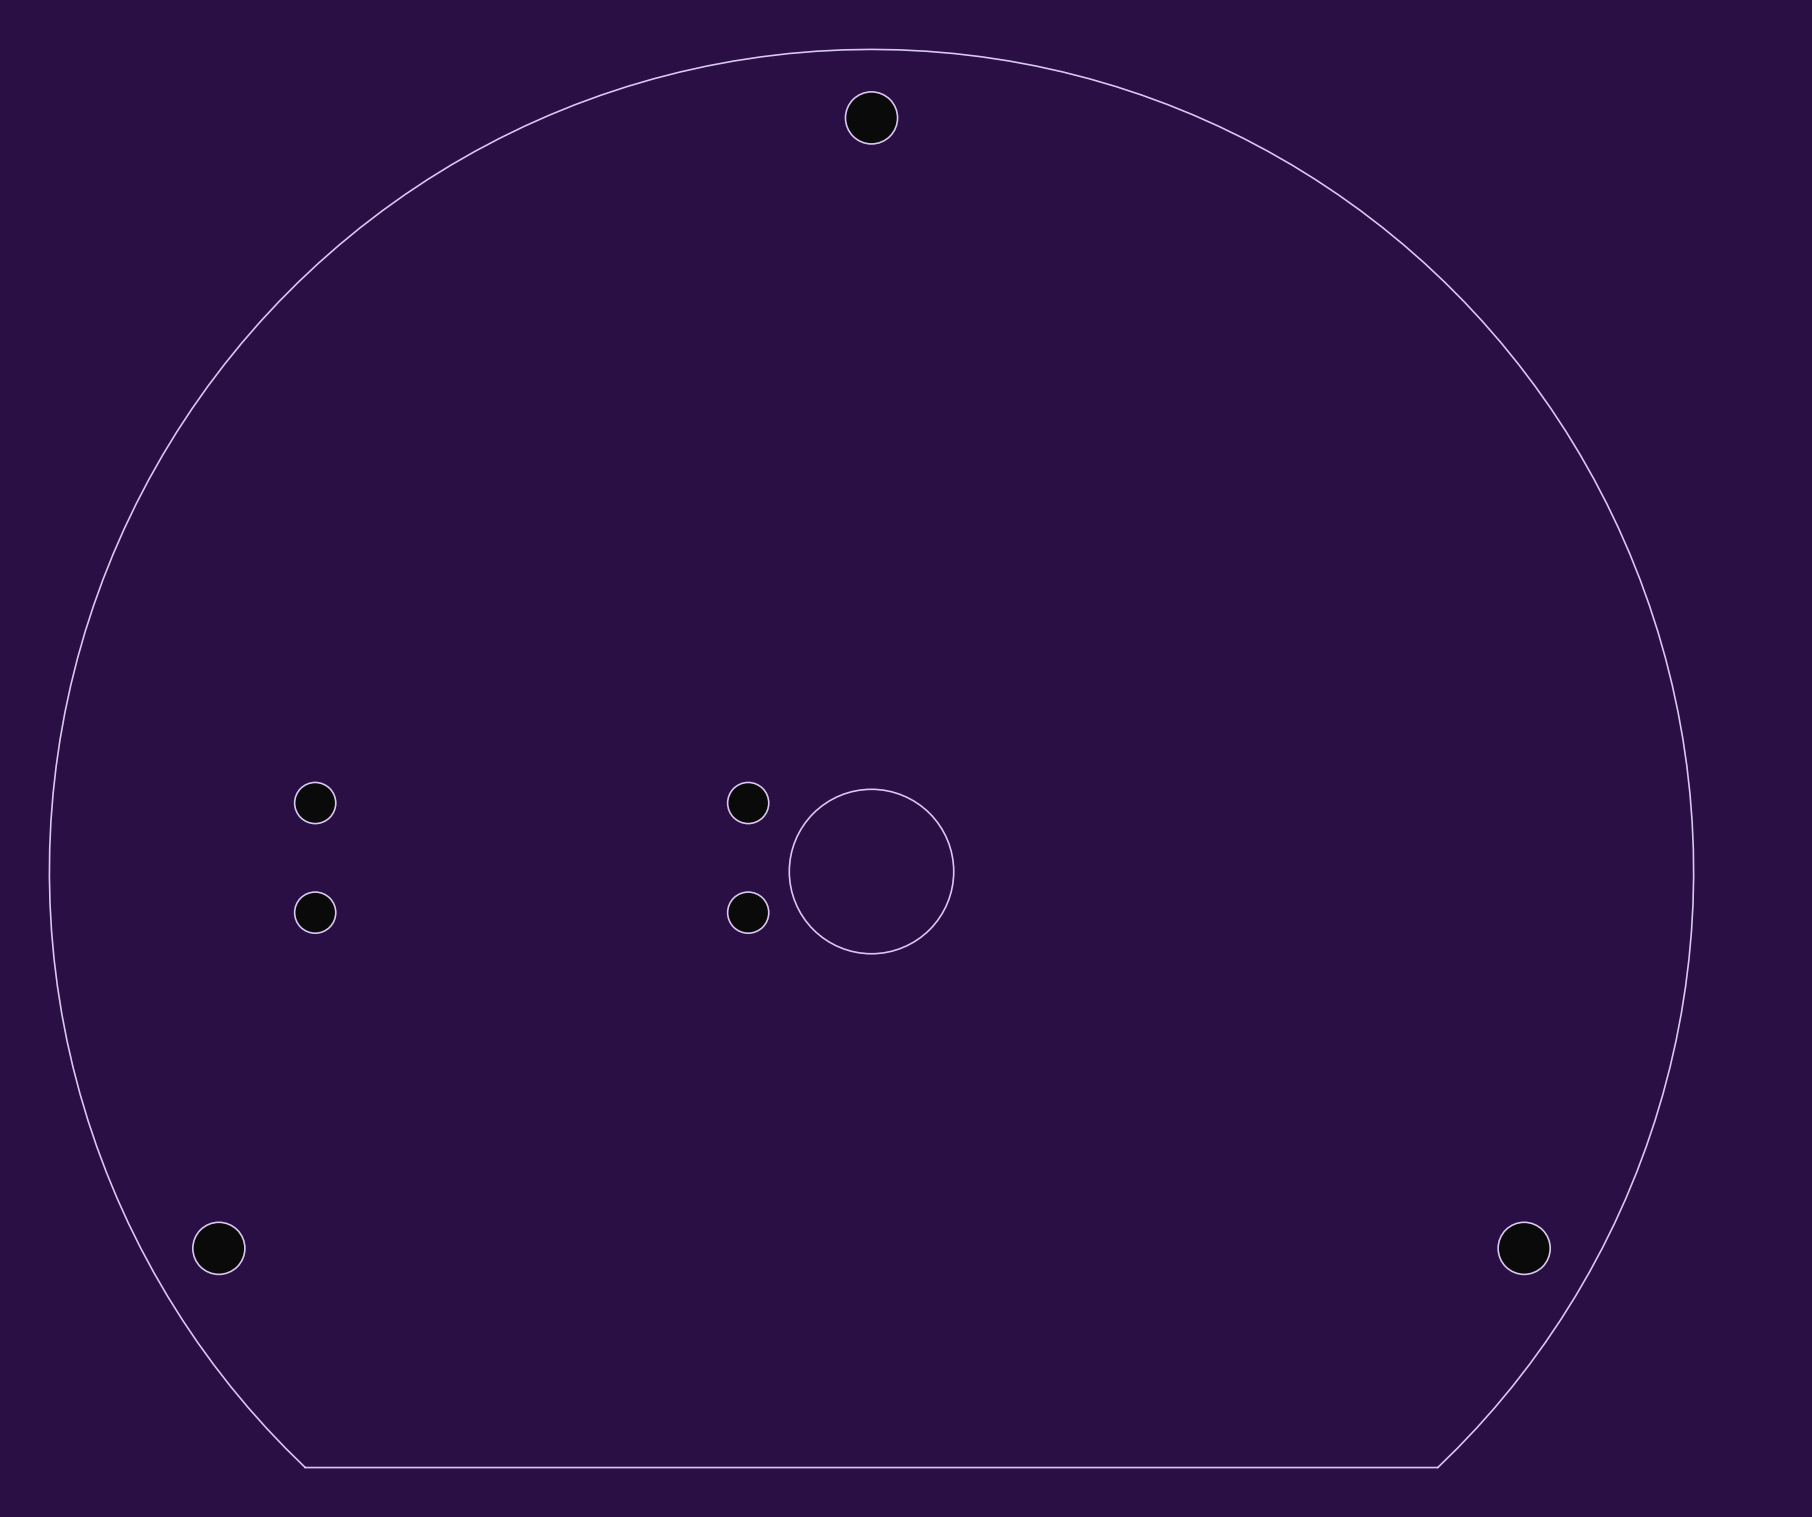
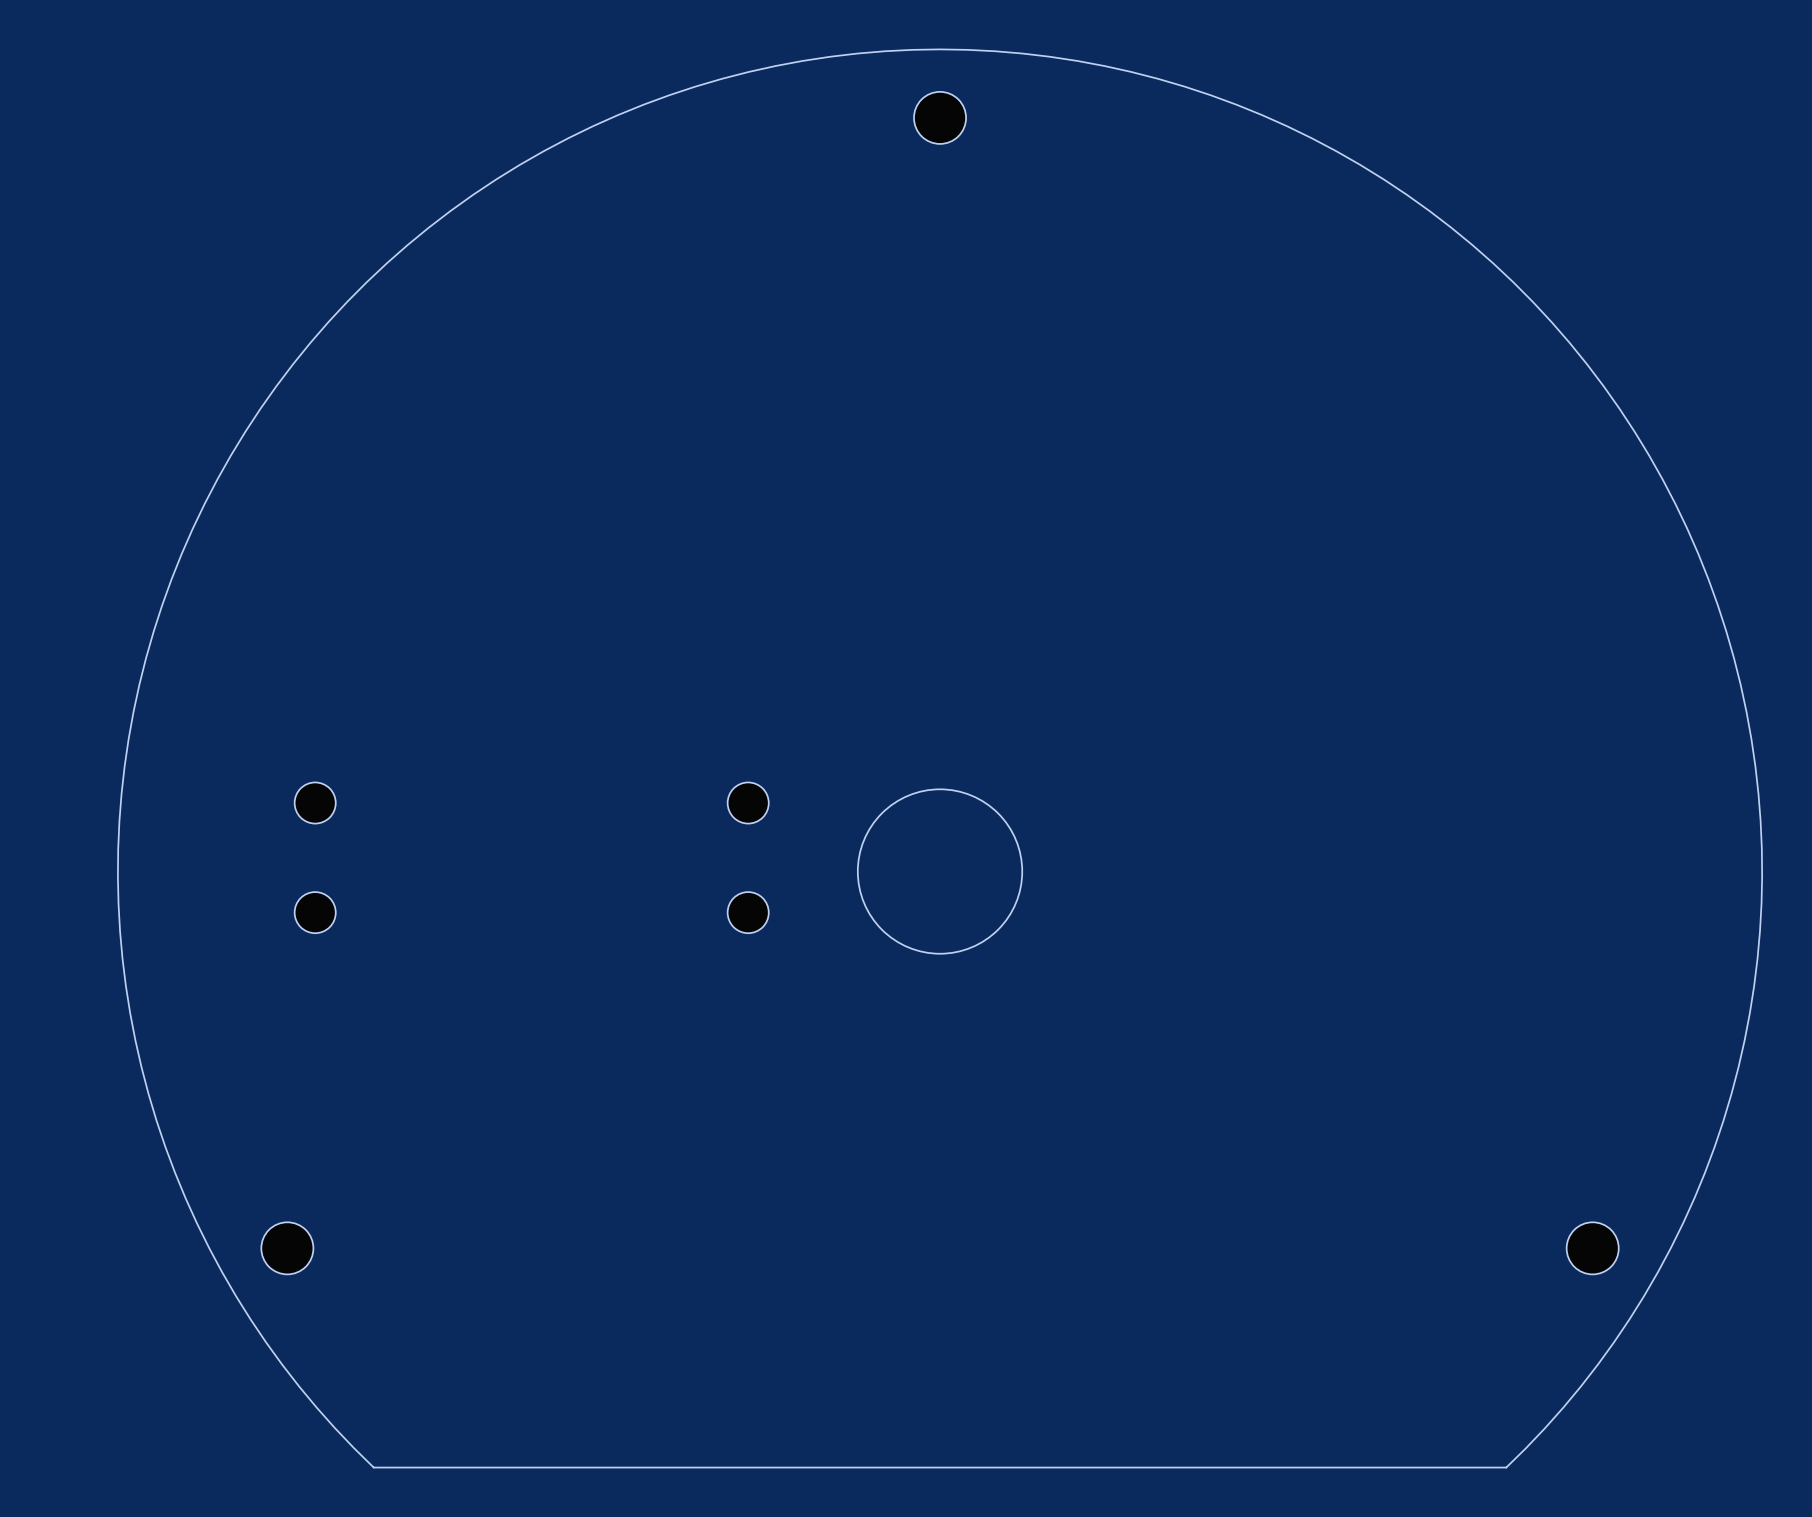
part position: (871, 117) -> (940, 117)
round board edge position: (871, 871) -> (940, 871)
part position: (218, 1248) -> (287, 1248)
part position: (1524, 1248) -> (1592, 1248)
board edge: (1437, 1467) (1476, 1428) (1512, 1386) (1545, 1342) (1589, 1272) (1614, 1223) (1646, 1146) (1662, 1094) (1676, 1040) (1685, 986) (1691, 931) (1693, 876) (1692, 821) (1686, 766) (1678, 711) (1657, 631) (1640, 579) (1618, 528) (1594, 479) (1551, 408) (1518, 364) (1464, 301) (1424, 263) (1382, 227) (1338, 194) (1291, 165) (1218, 126) (1168, 104) (1115, 86) (1035, 65) (981, 56) (926, 51) (871, 49) (816, 51) (734, 60) (680, 71) (627, 86) (549, 115) (499, 138) (451, 165) (382, 210) (339, 245) (278, 301) (241, 342) (207, 386) (176, 431) (148, 479) (124, 528) (93, 605) (70, 684) (60, 739) (53, 793) (49, 876) (51, 931) (57, 986) (73, 1067) (88, 1120) (117, 1198) (140, 1247) (182, 1319) (230, 1386) (266, 1428) (305, 1467) (373, 1467) -> (1437, 1467) (1506, 1467) (1544, 1428) (1580, 1386) (1629, 1319) (1670, 1247) (1705, 1172) (1723, 1120) (1744, 1040) (1754, 986) (1759, 931) (1762, 876) (1758, 793) (1751, 739) (1734, 658) (1717, 605) (1687, 528) (1662, 479) (1634, 431) (1603, 386) (1551, 321) (1513, 282) (1472, 245) (1429, 210) (1383, 179) (1336, 151) (1287, 126) (1210, 95) (1158, 78) (1077, 60) (995, 51) (940, 49) (884, 51) (802, 60) (748, 71) (695, 86) (643, 104) (592, 126) (519, 165) (473, 194) (428, 227) (386, 263) (328, 321) (293, 364) (260, 408) (231, 455) (192, 528) (171, 579) (153, 631) (139, 684) (128, 739) (121, 793) (117, 876) (120, 931) (125, 986) (135, 1040) (148, 1094) (174, 1172) (196, 1223) (222, 1272) (250, 1319) (282, 1364) (335, 1428) (373, 1467)

